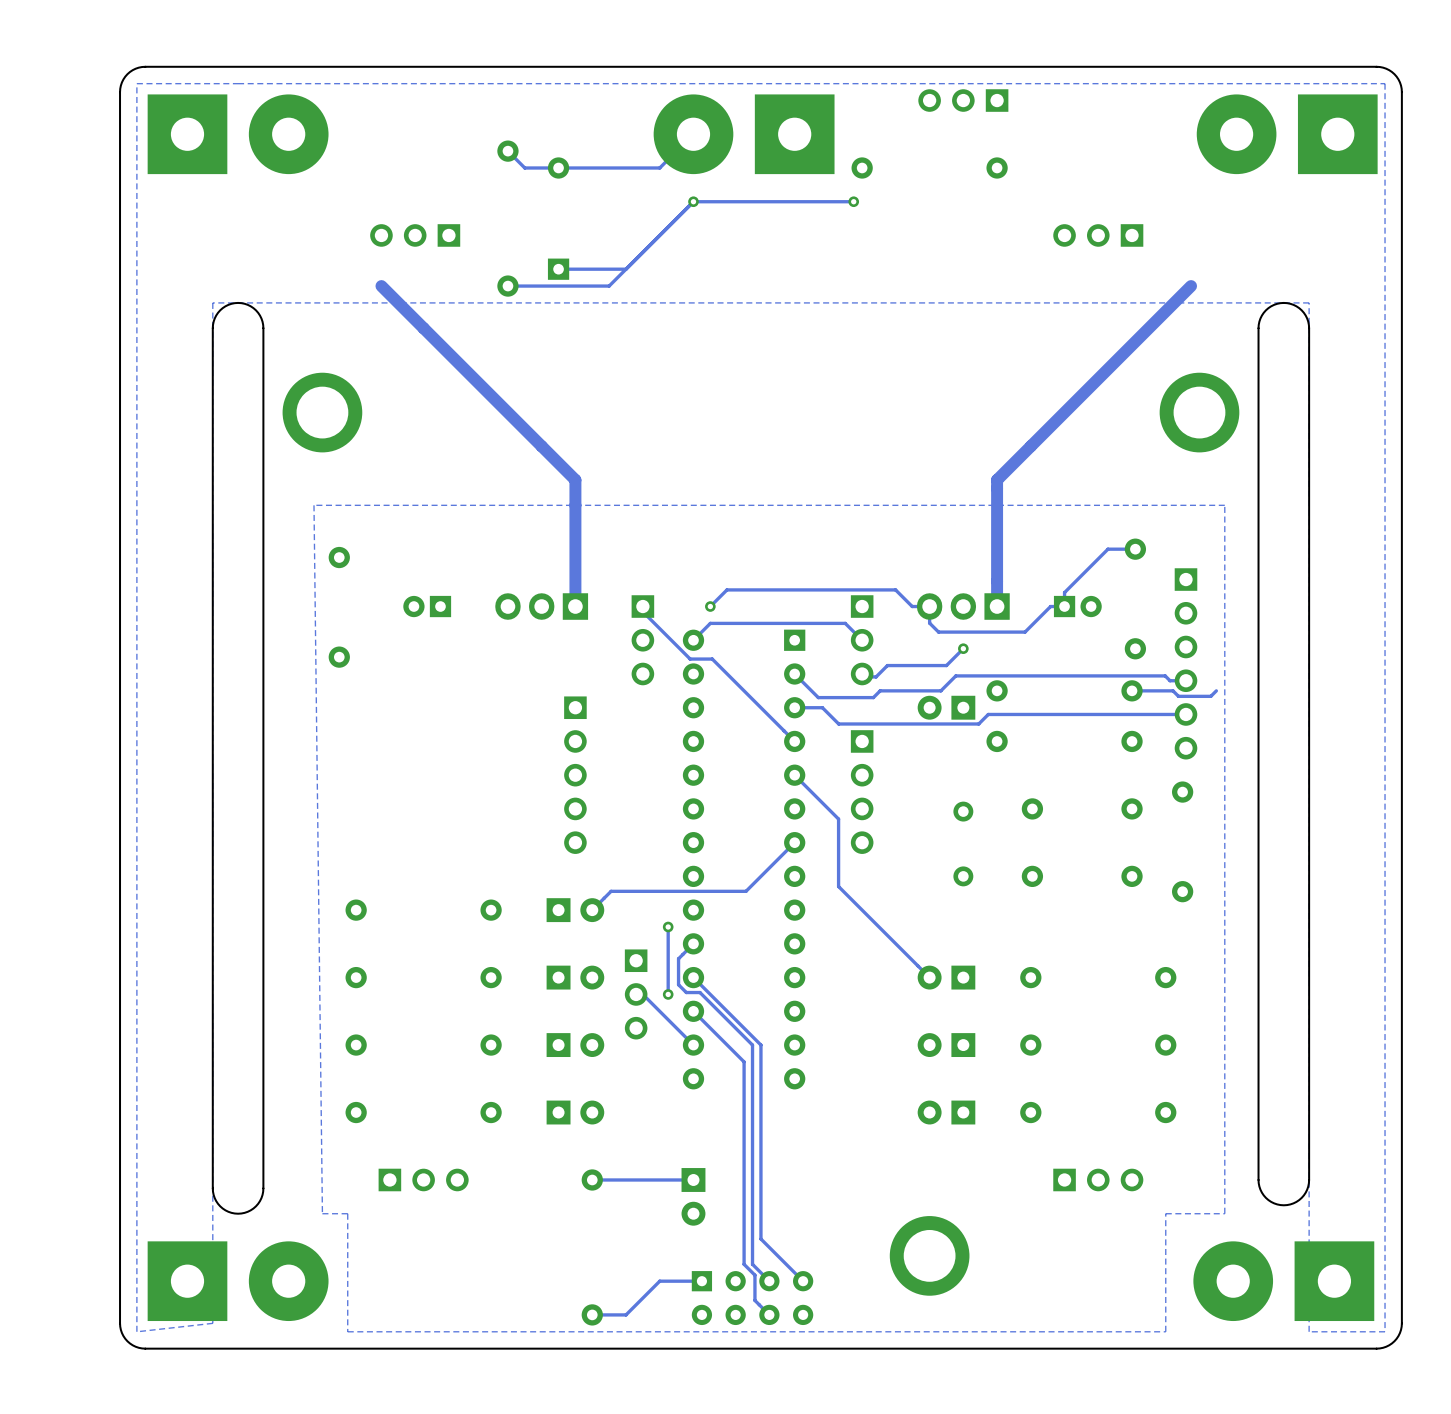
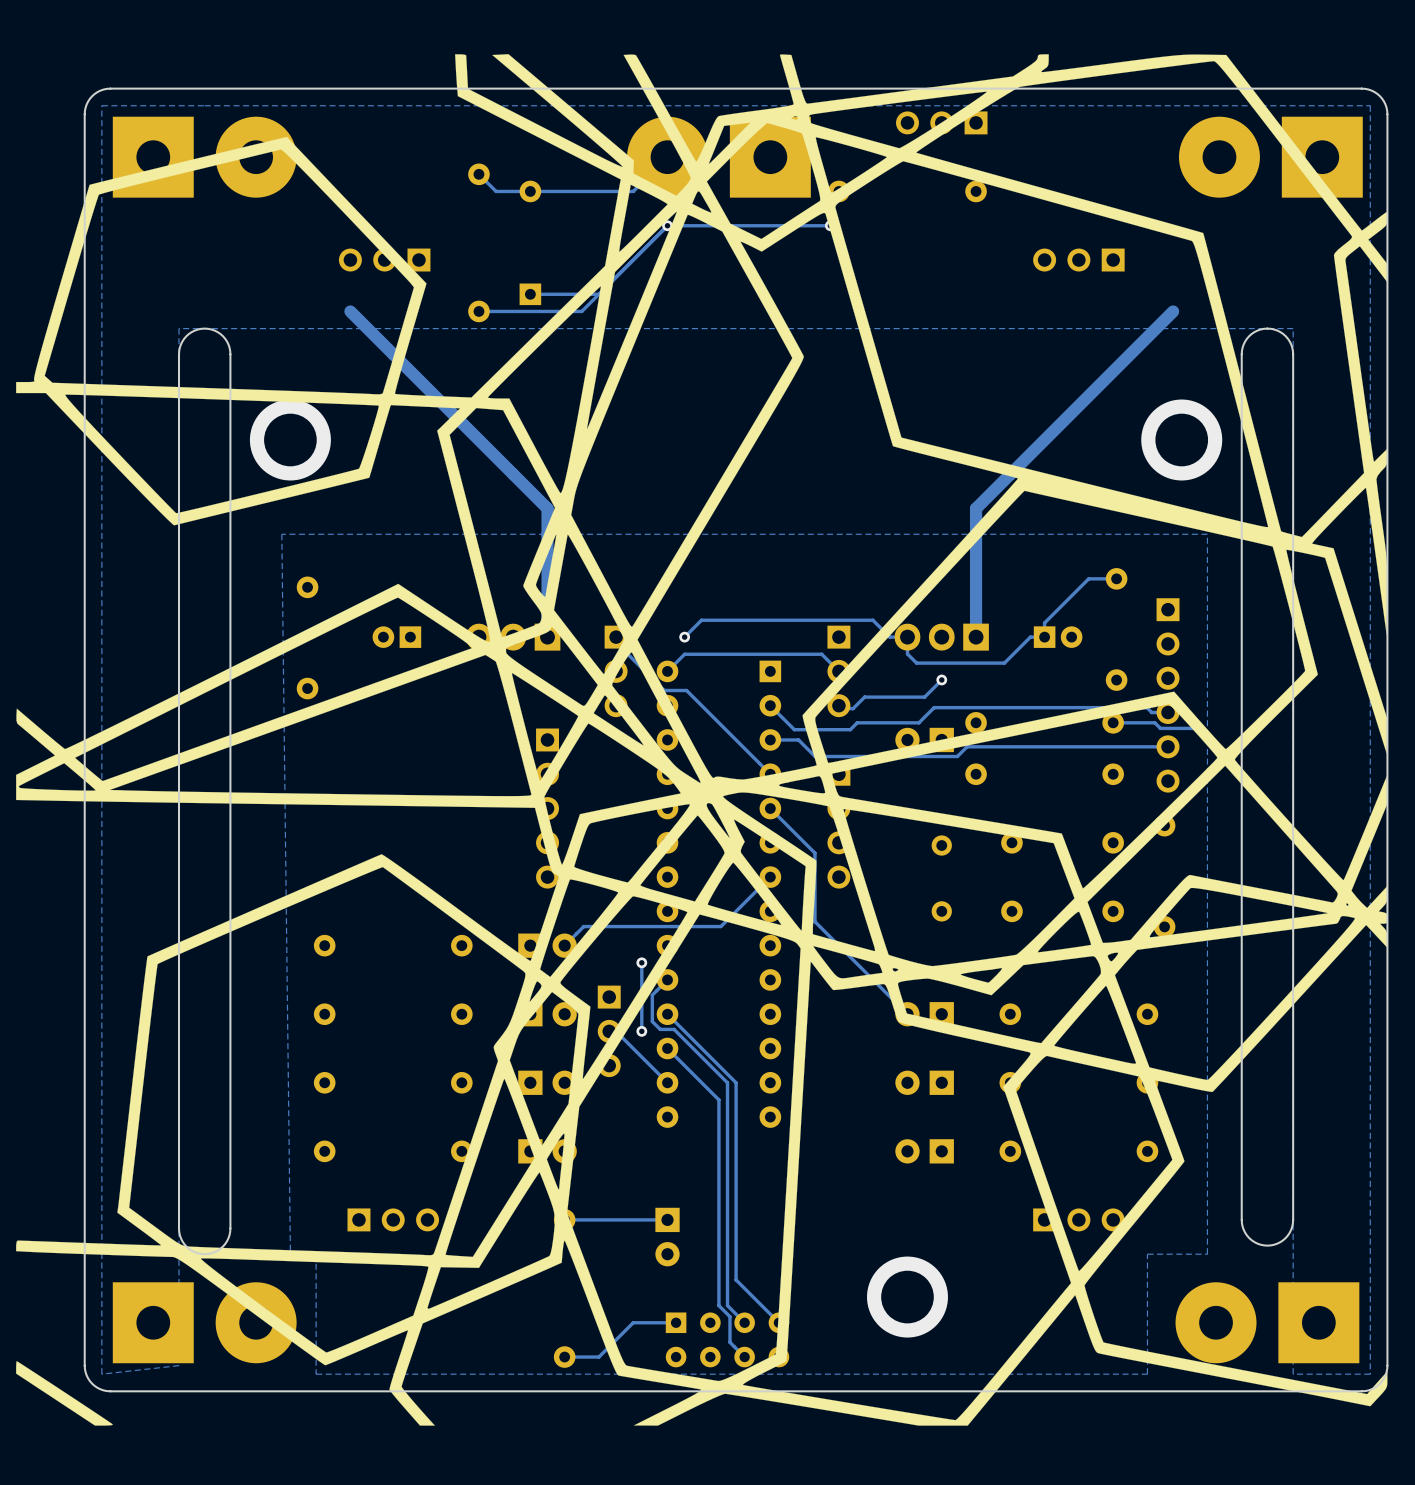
drawing: none -> [16, 54, 1388, 1426]

